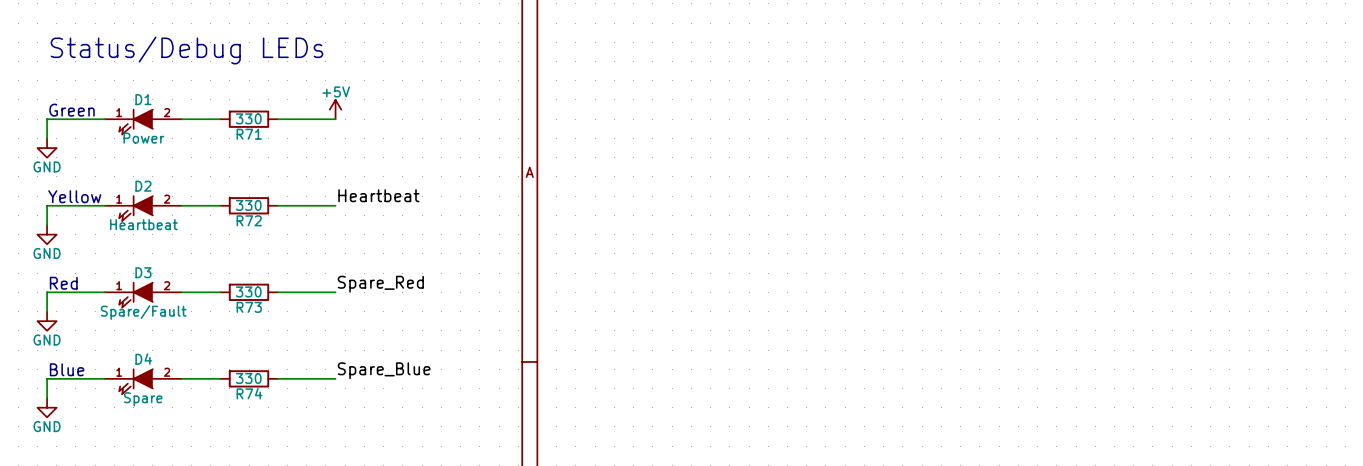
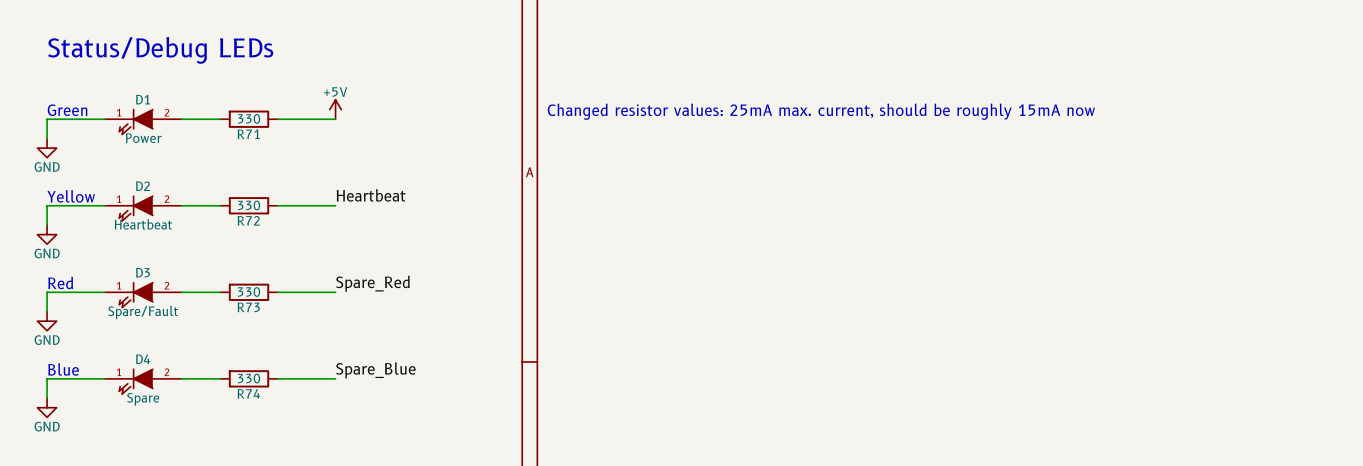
text: none -> Changed resistor values: 25mA max. current, should be roughly 15mA now (821, 111)

